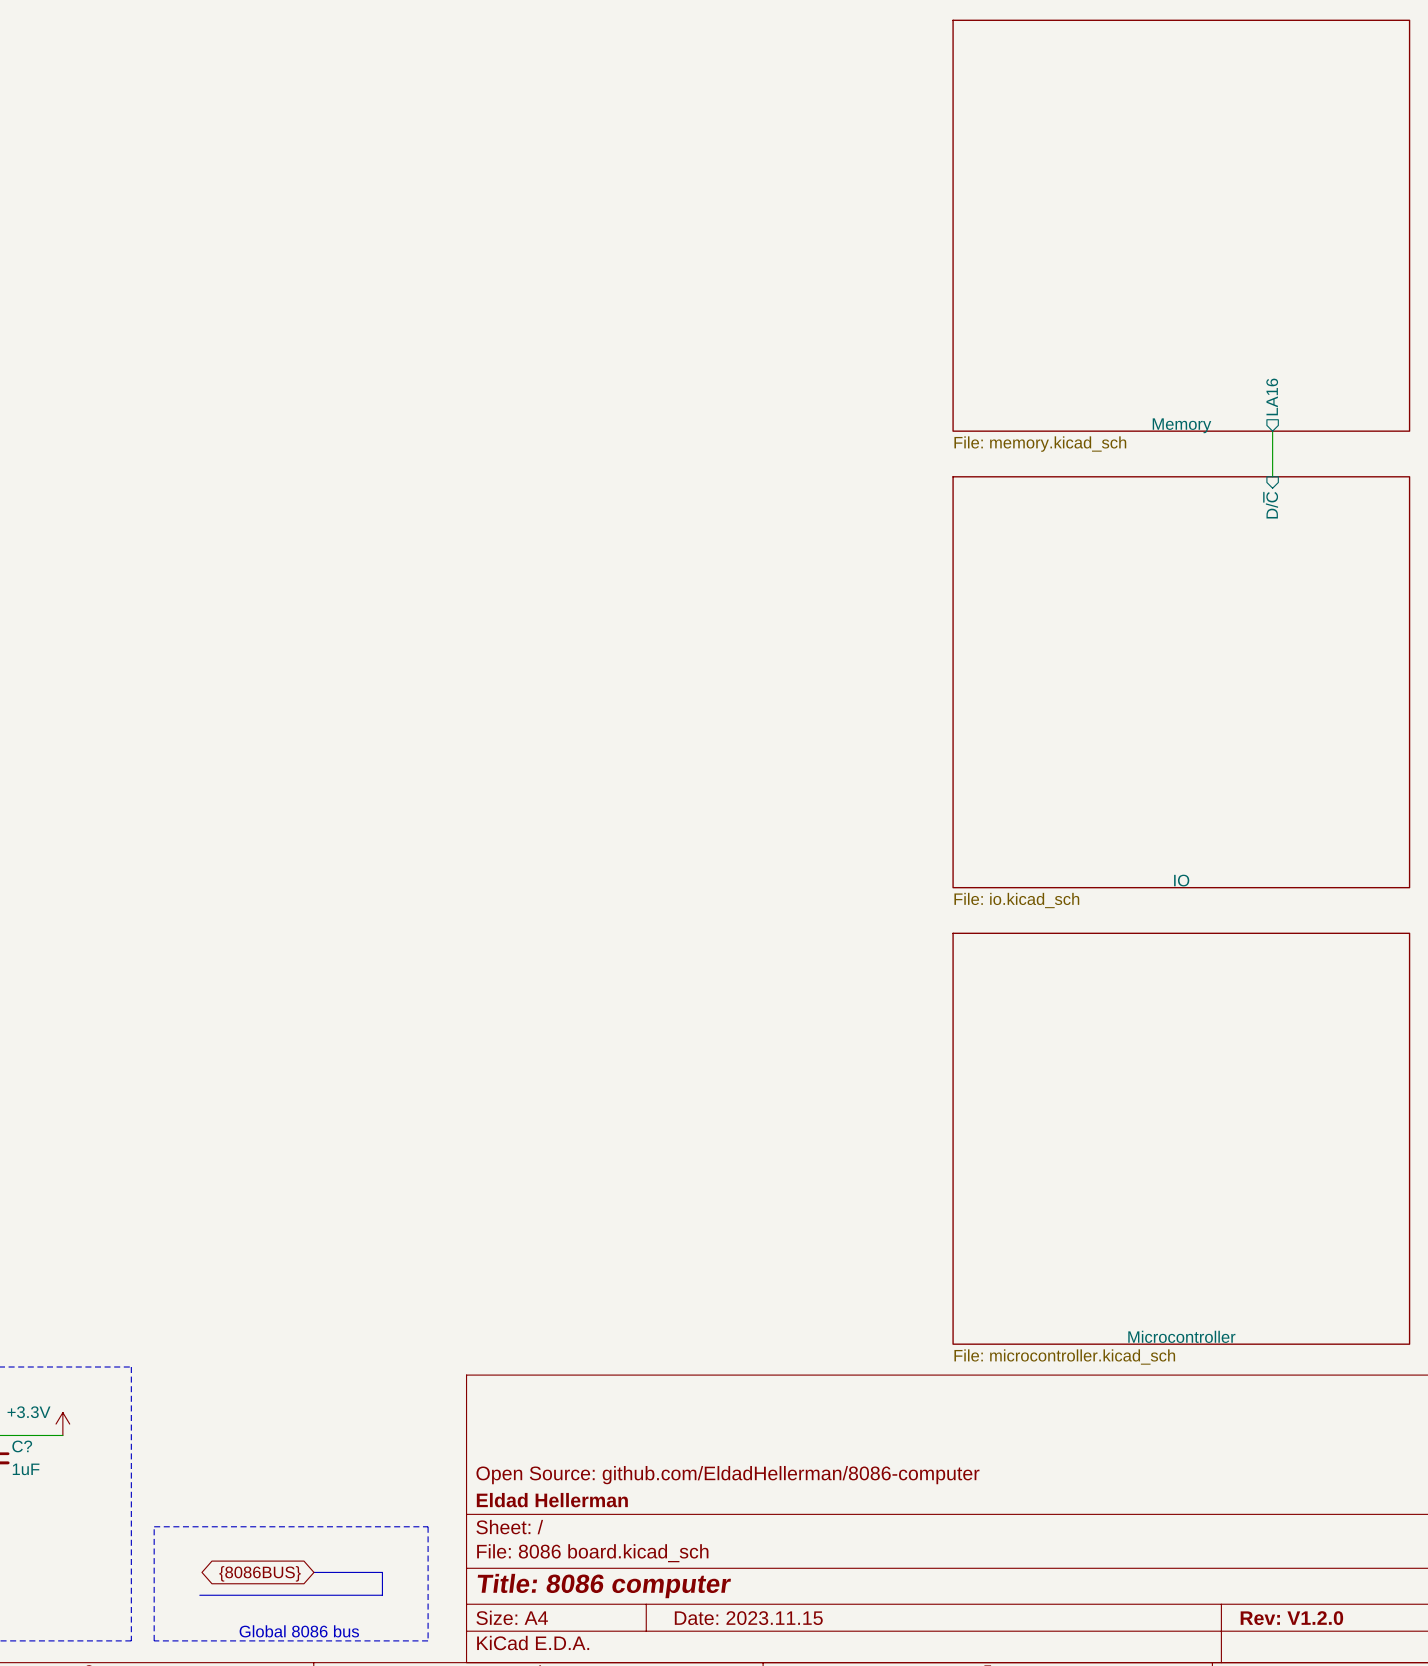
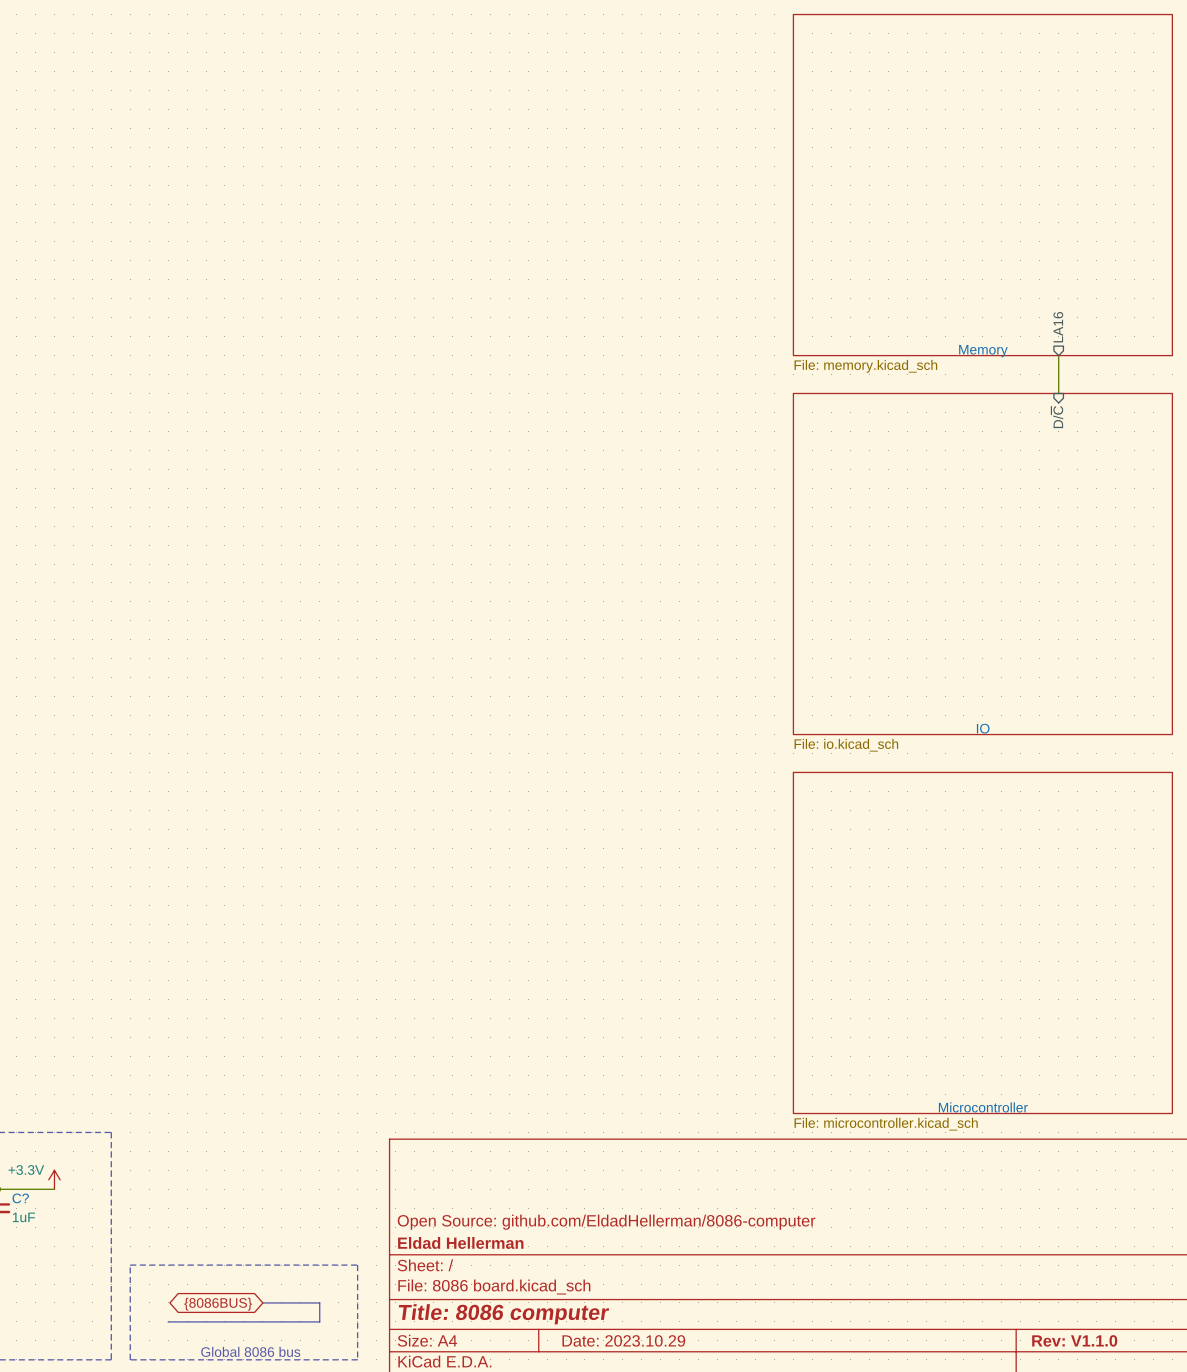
title block: Date: 2023.11.15 (748, 1618) -> Date: 2023.10.29 (623, 1340)
title block: Rev: V1.2.0 (1291, 1618) -> Rev: V1.1.0 (1074, 1340)

